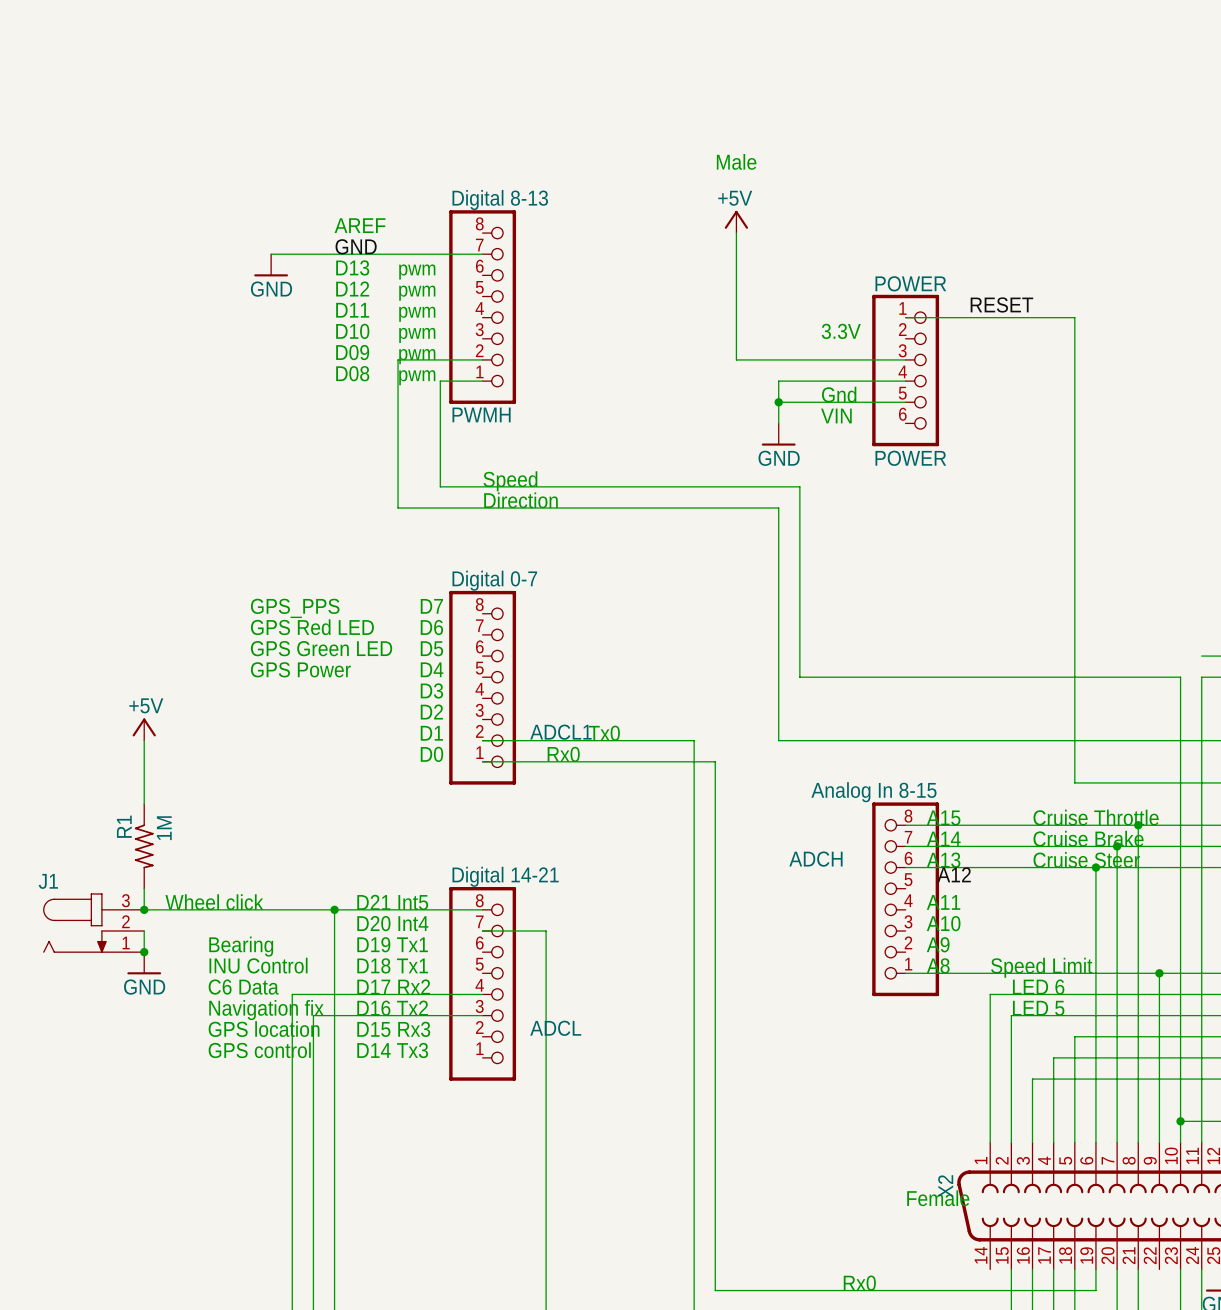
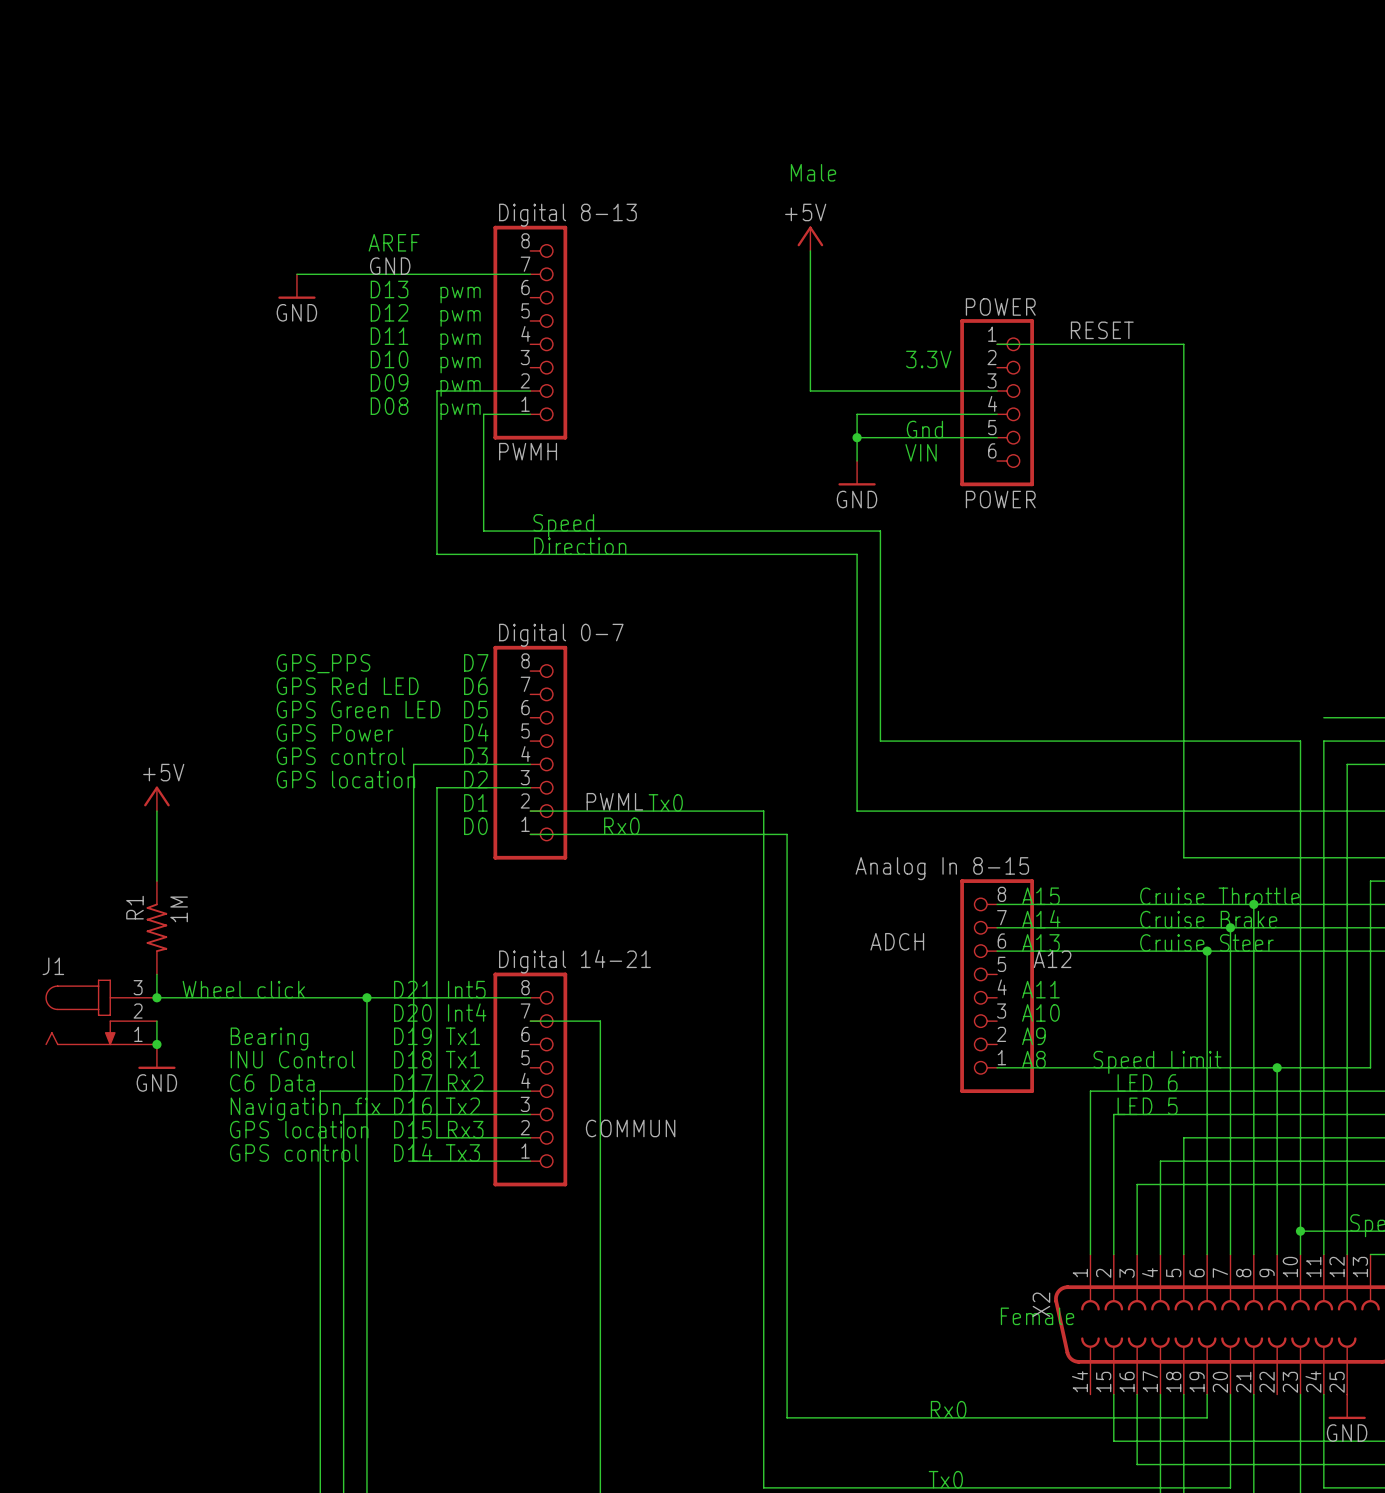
text: none -> GPS control (340, 756)
wire: none -> (530, 764) (413, 764) (413, 1161) (530, 1161)
text: none -> GPS location (345, 779)
wire: none -> (530, 787) (436, 787) (436, 1137) (530, 1137)
ADCL1 name: ADCL1 (560, 732) -> PWML (614, 801)
ADCL name: ADCL (555, 1028) -> COMMUN (630, 1128)

